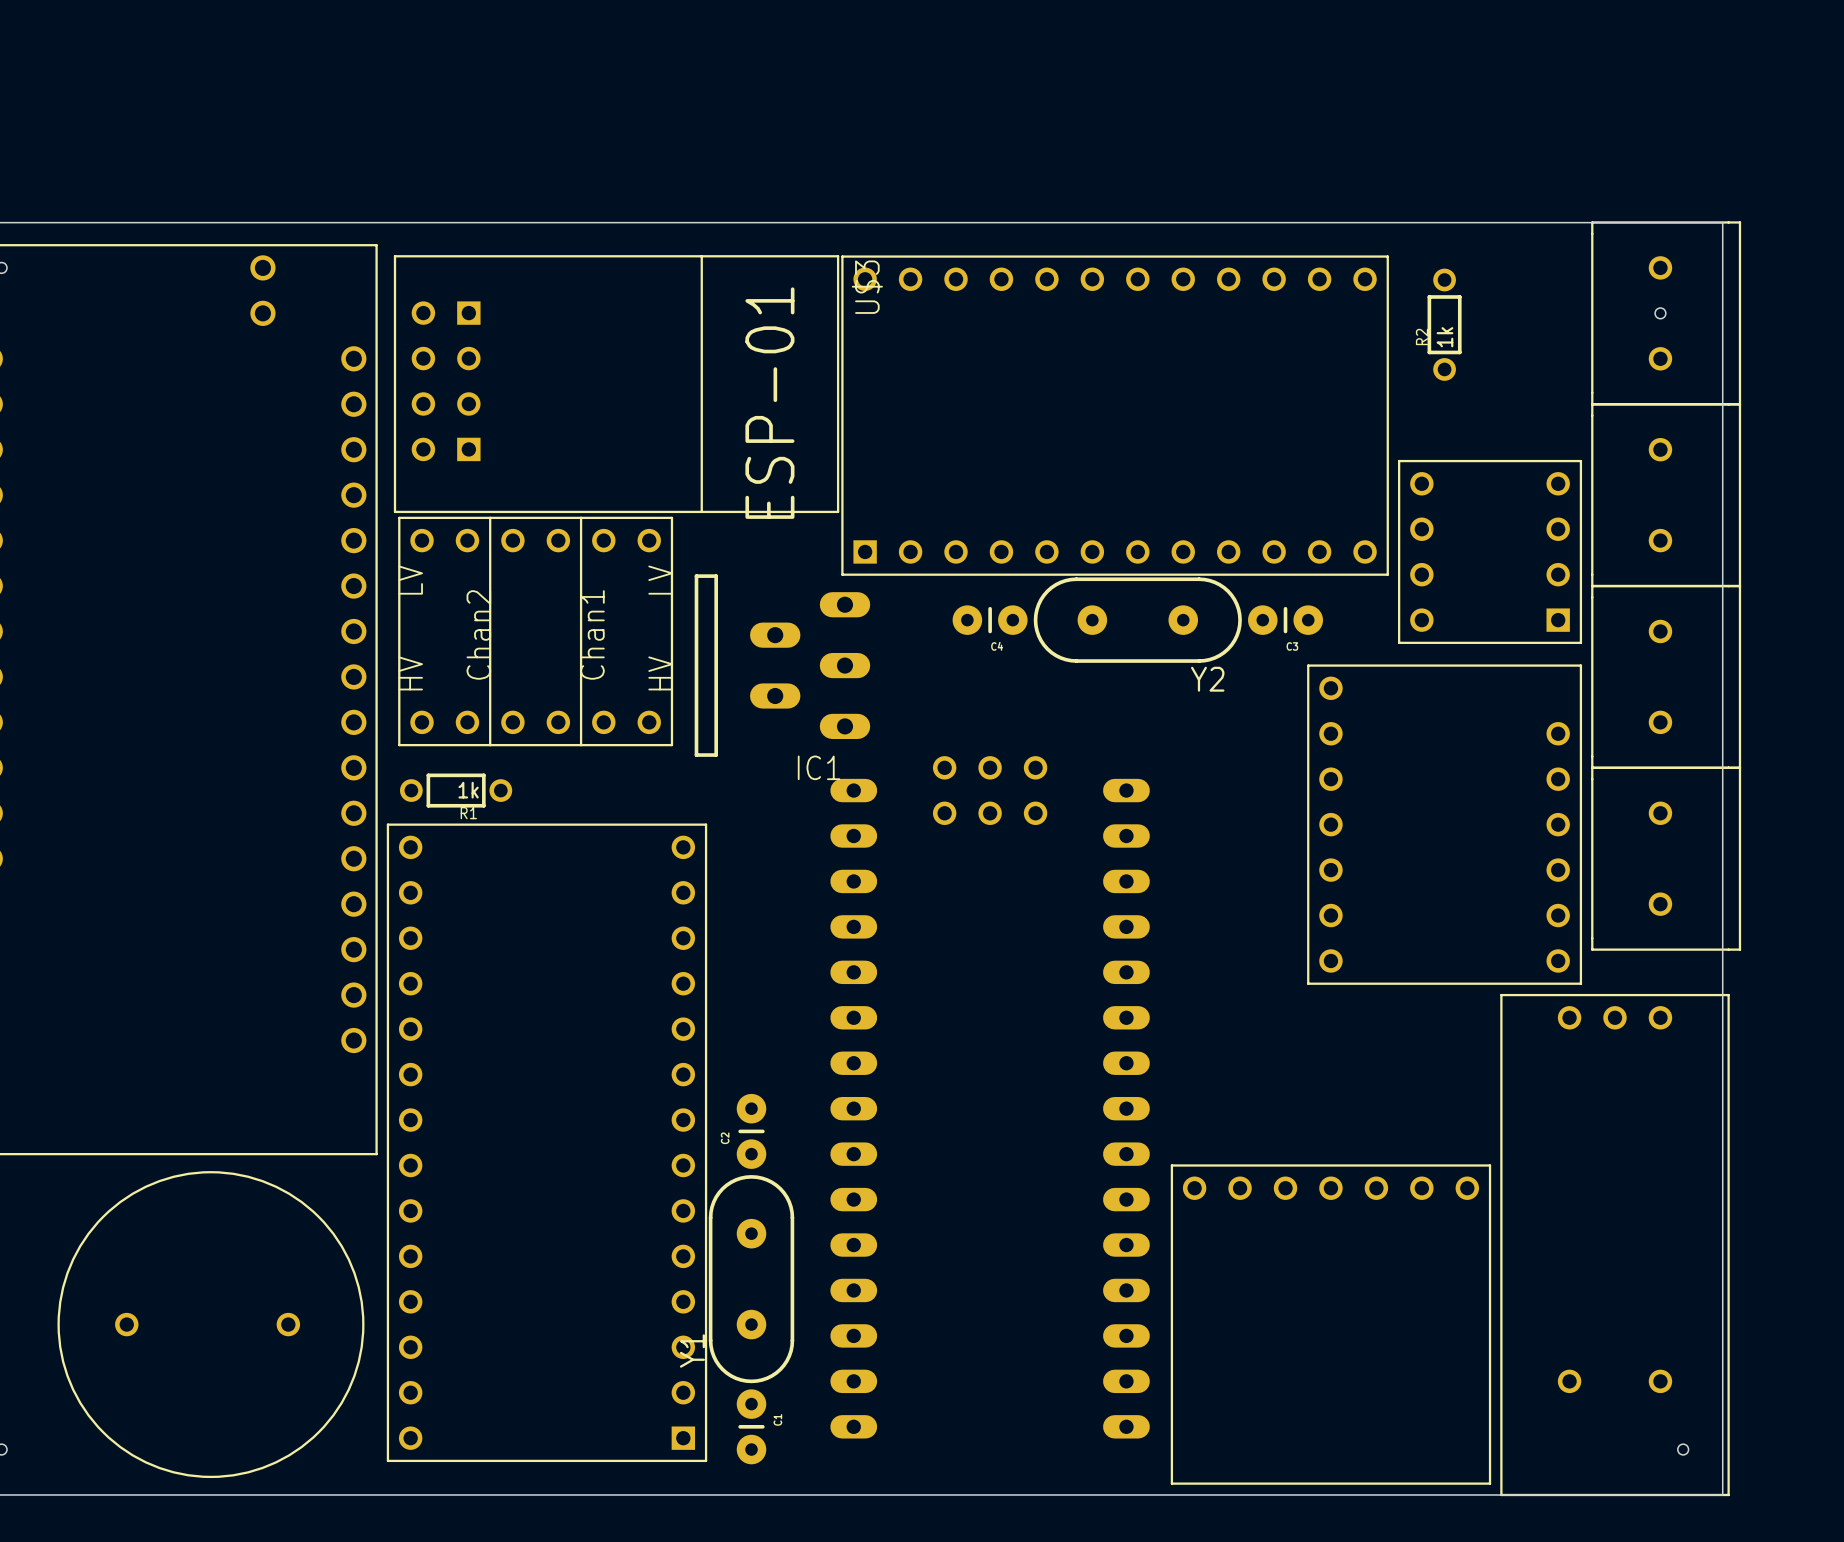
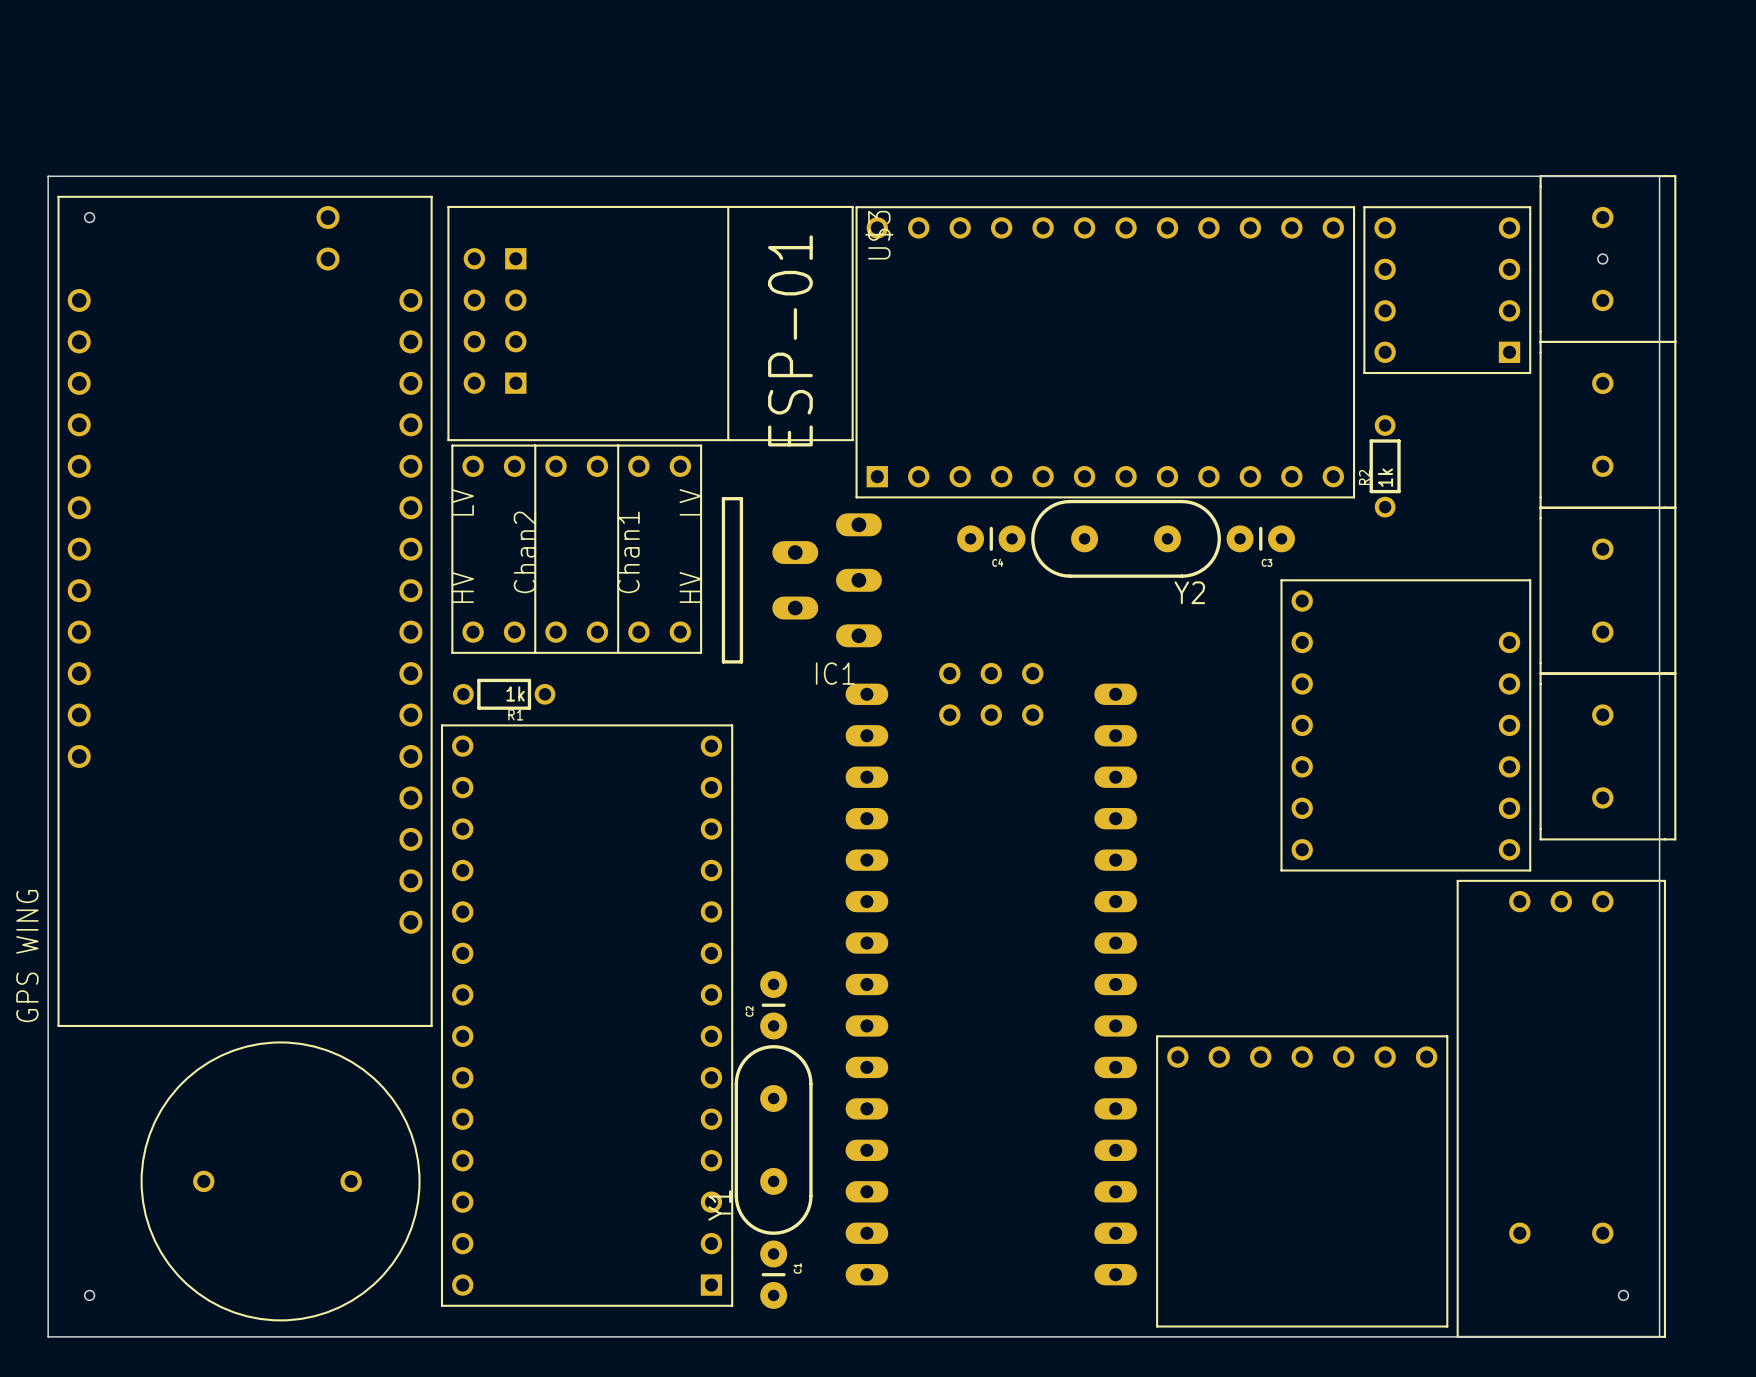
R2 position: (1444, 324) -> (1385, 466)
part position: (1490, 551) -> (1447, 290)

